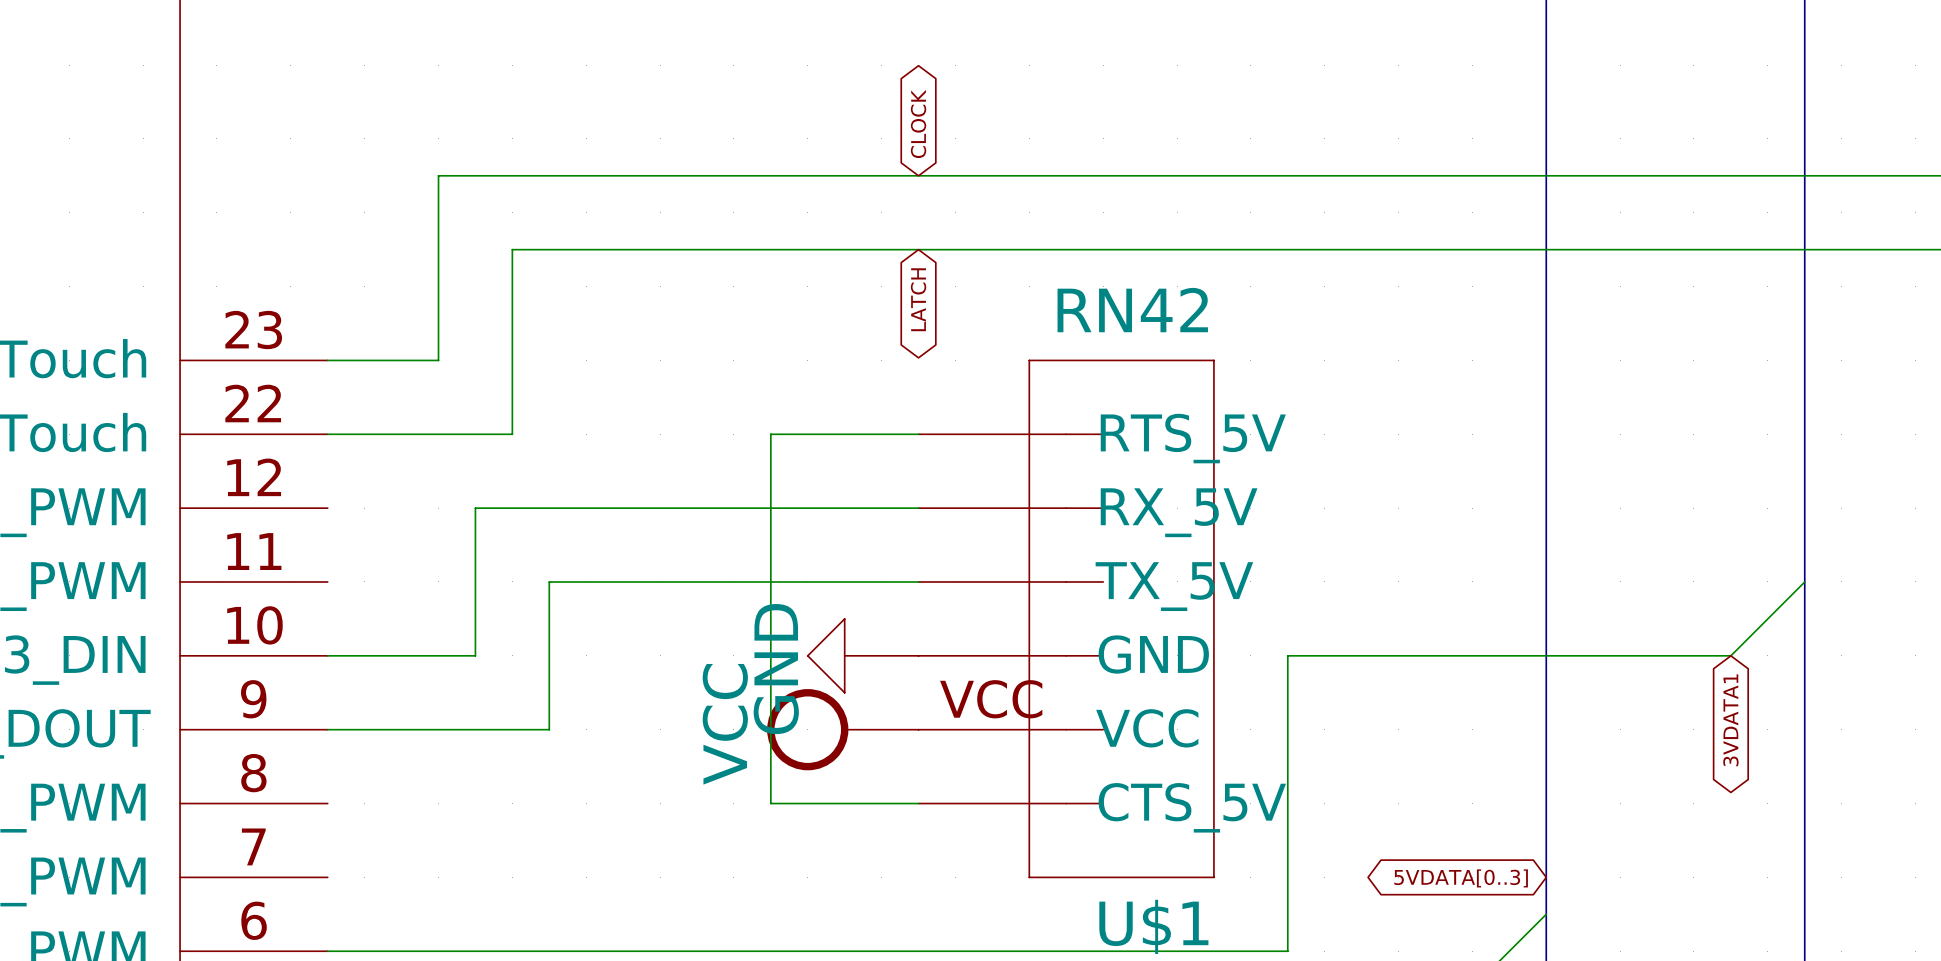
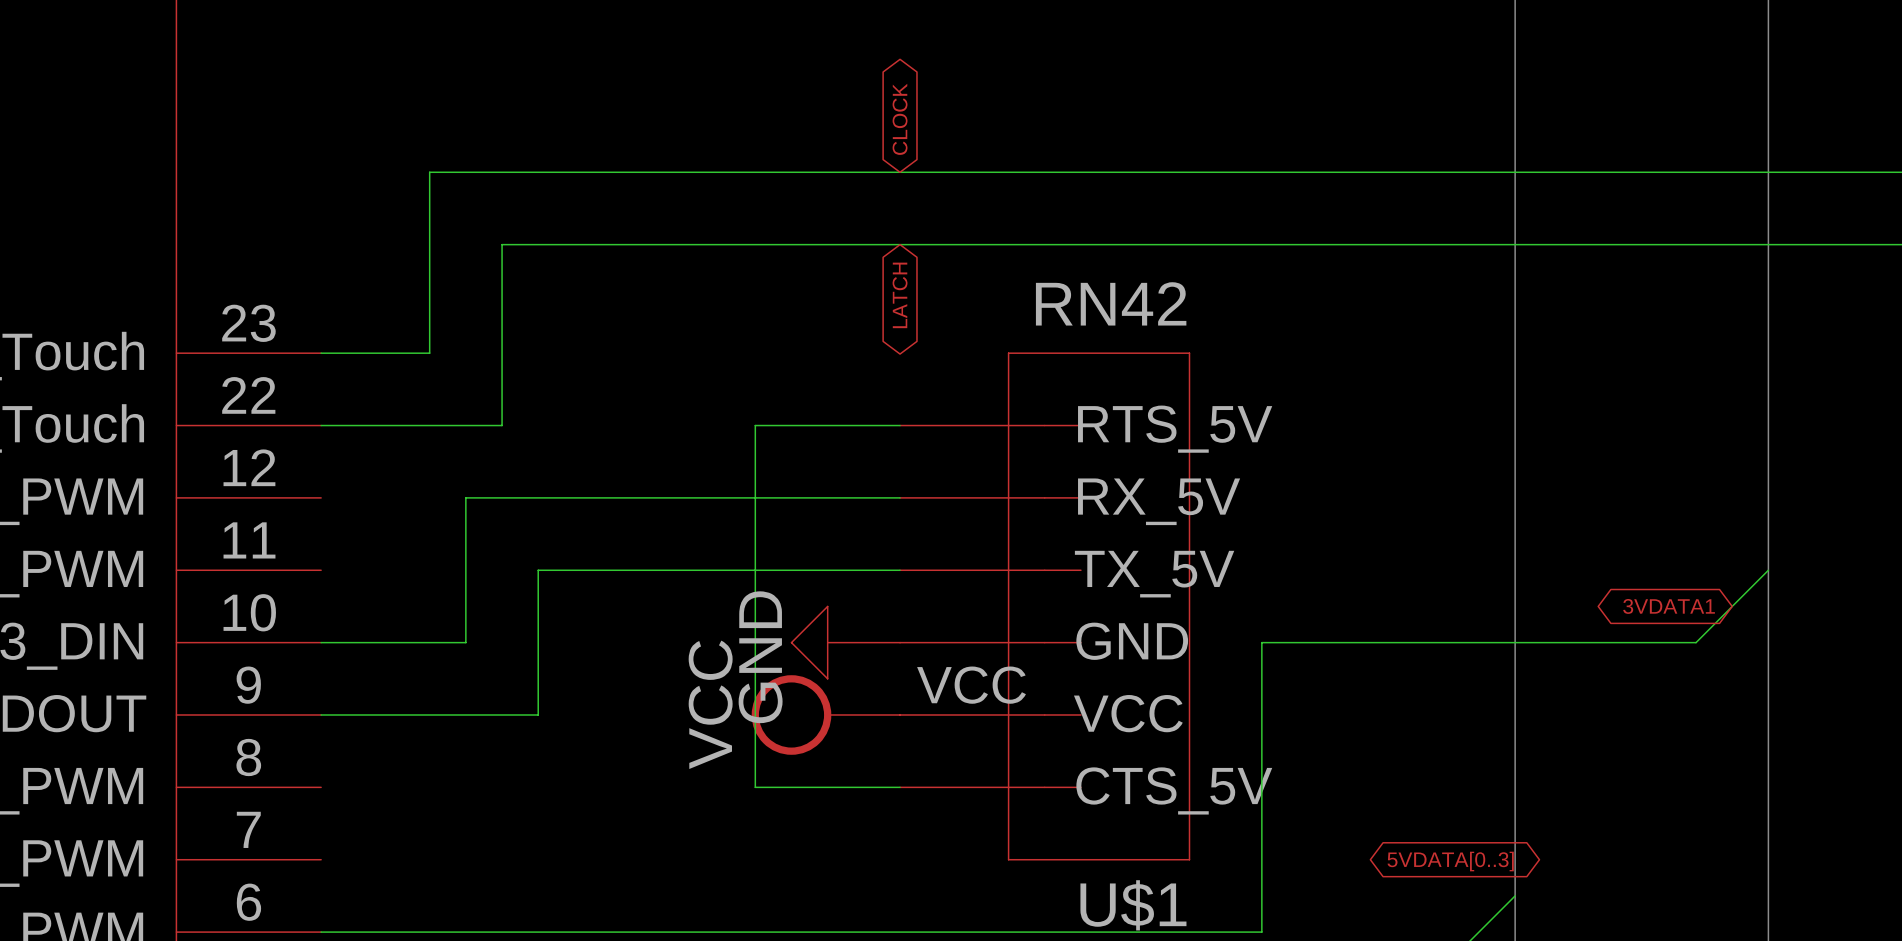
global label rotation: 0° (1730, 720) -> 90° clockwise (1669, 606)
global label rotation: 0° (1461, 878) -> 180° (1450, 861)

